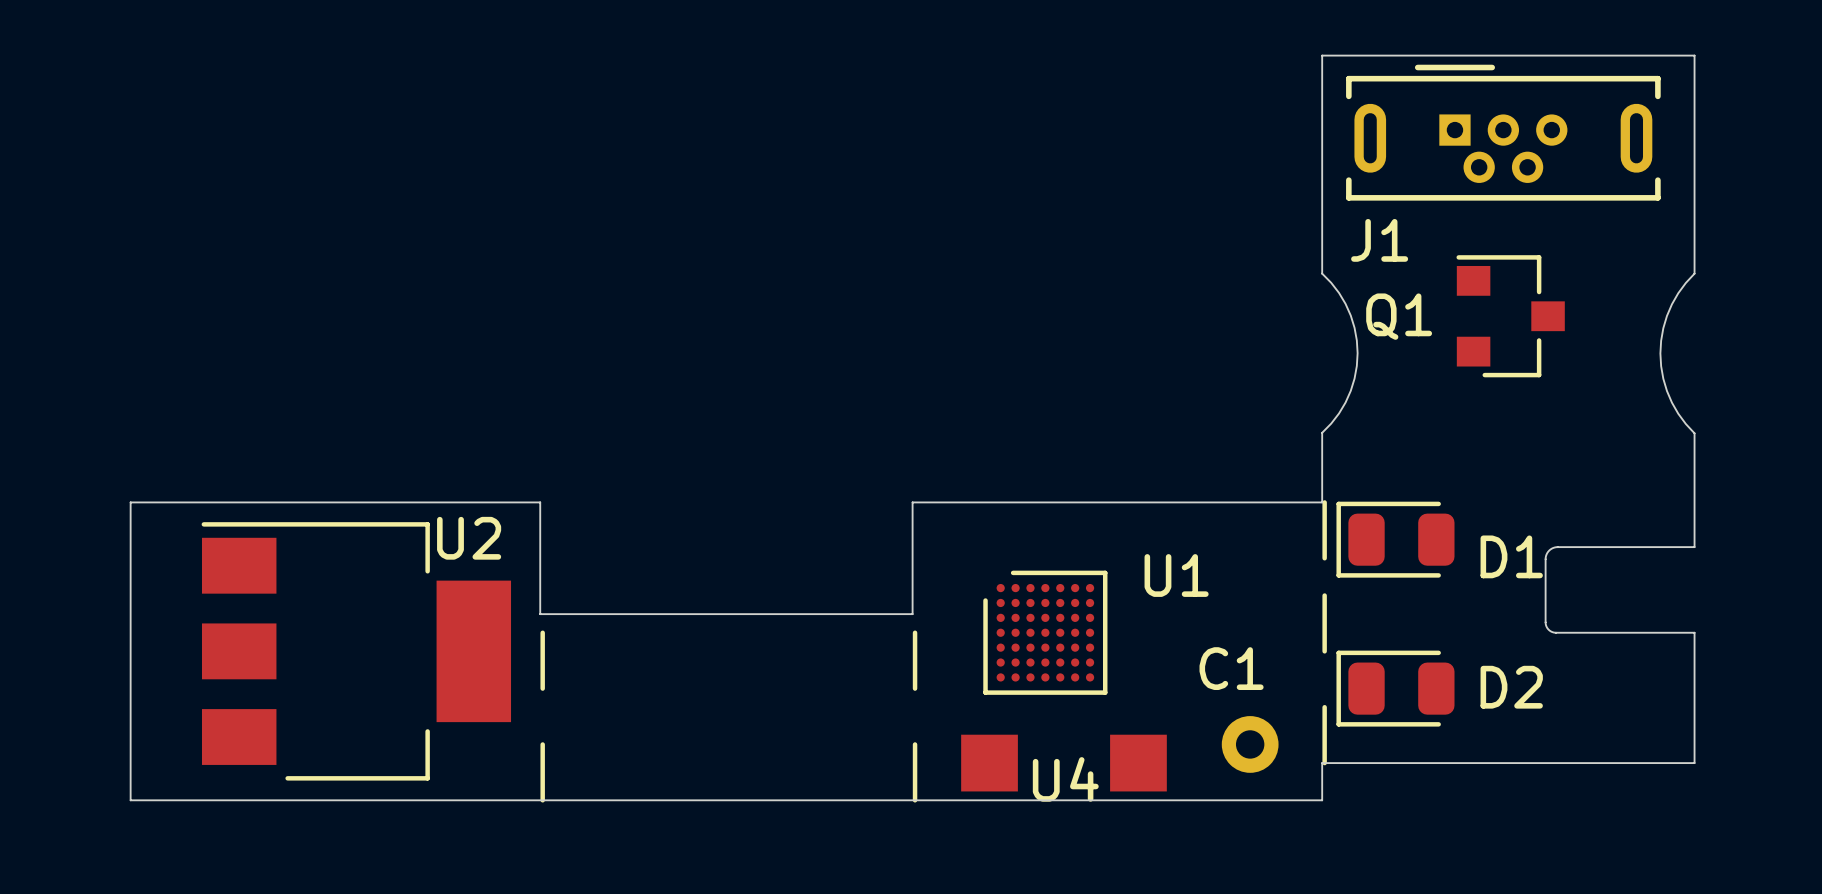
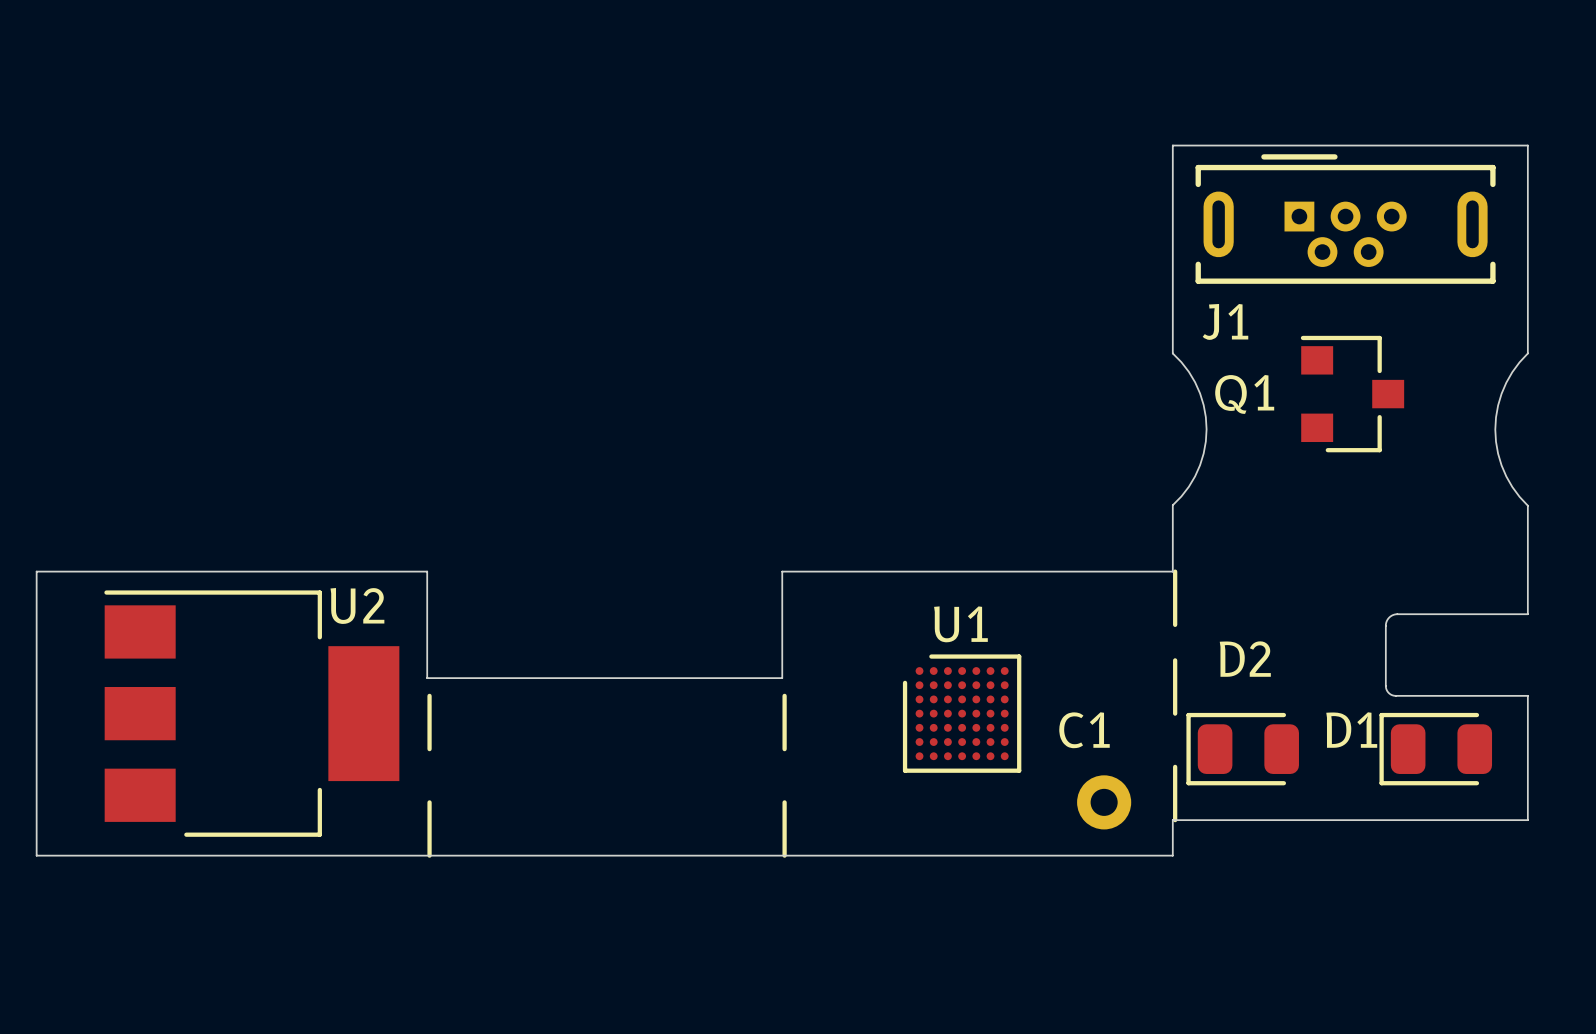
D1 position: (1395, 539) -> (1435, 749)
D1 name position: D1 (1511, 556) -> D1 (1351, 730)
U1 name position: U1 (1176, 575) -> U1 (960, 624)
U1 position: (1045, 632) -> (962, 713)
D2 name position: D2 (1511, 687) -> D2 (1245, 659)
U4: (1063, 763) -> none

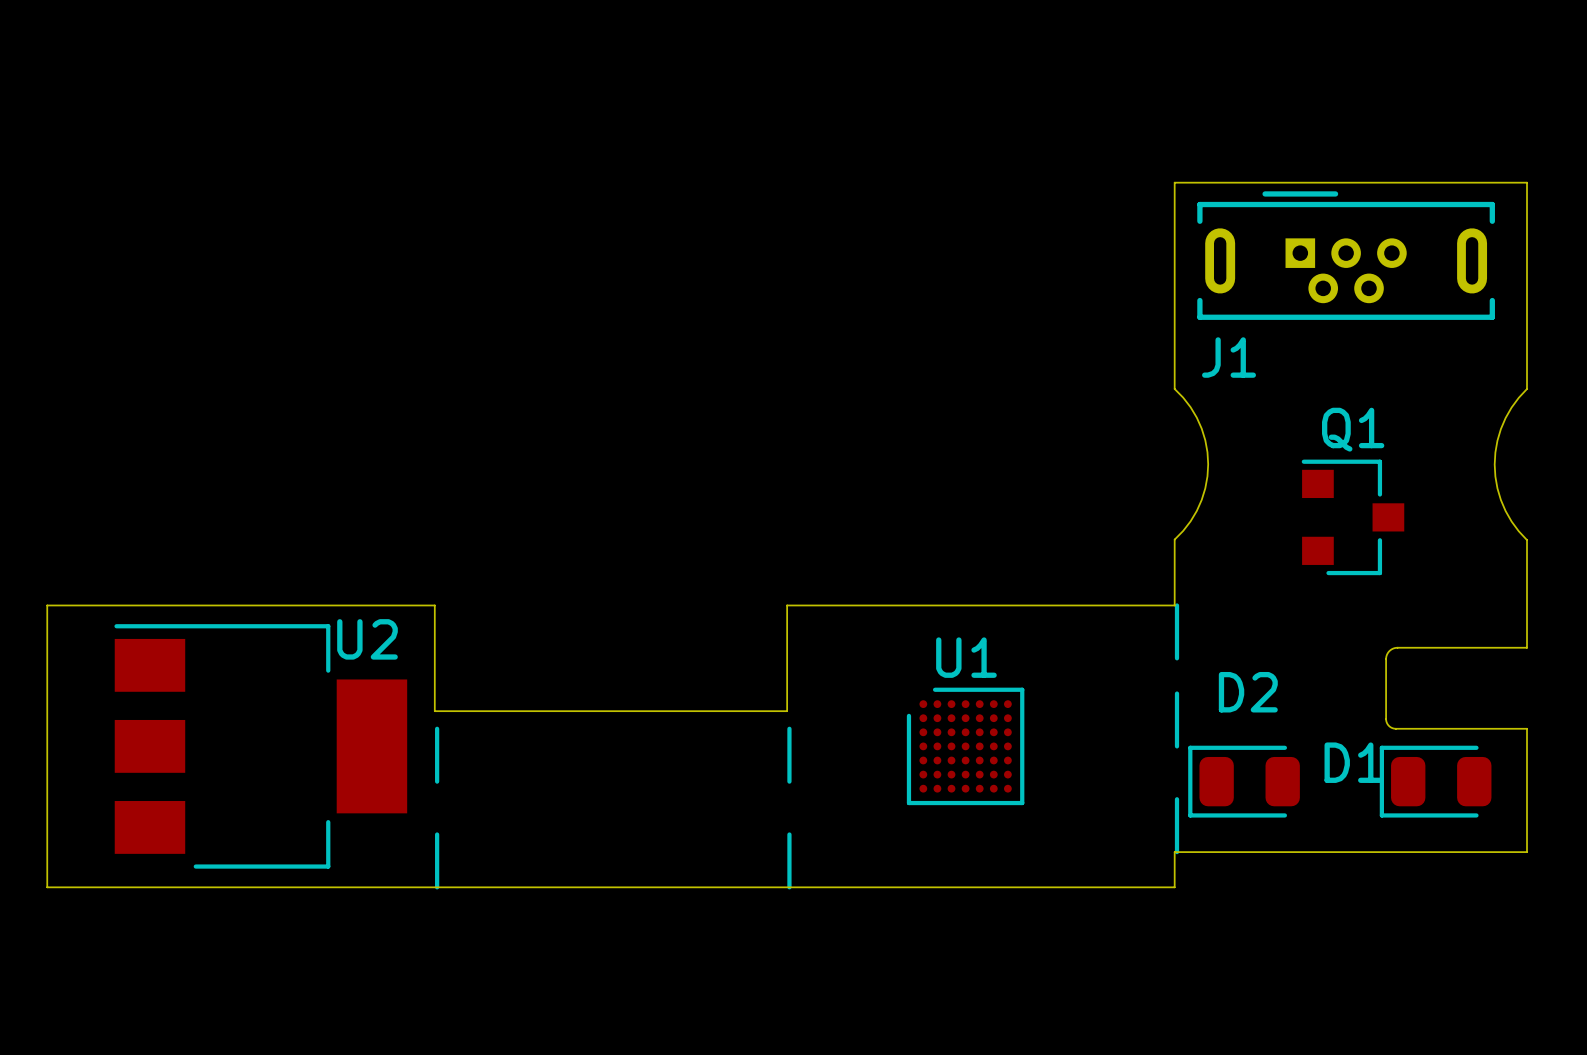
Q1 name position: Q1 (1244, 394) -> Q1 (1353, 429)
Q1 position: (1352, 394) -> (1352, 517)
C1: (1104, 802) -> none

